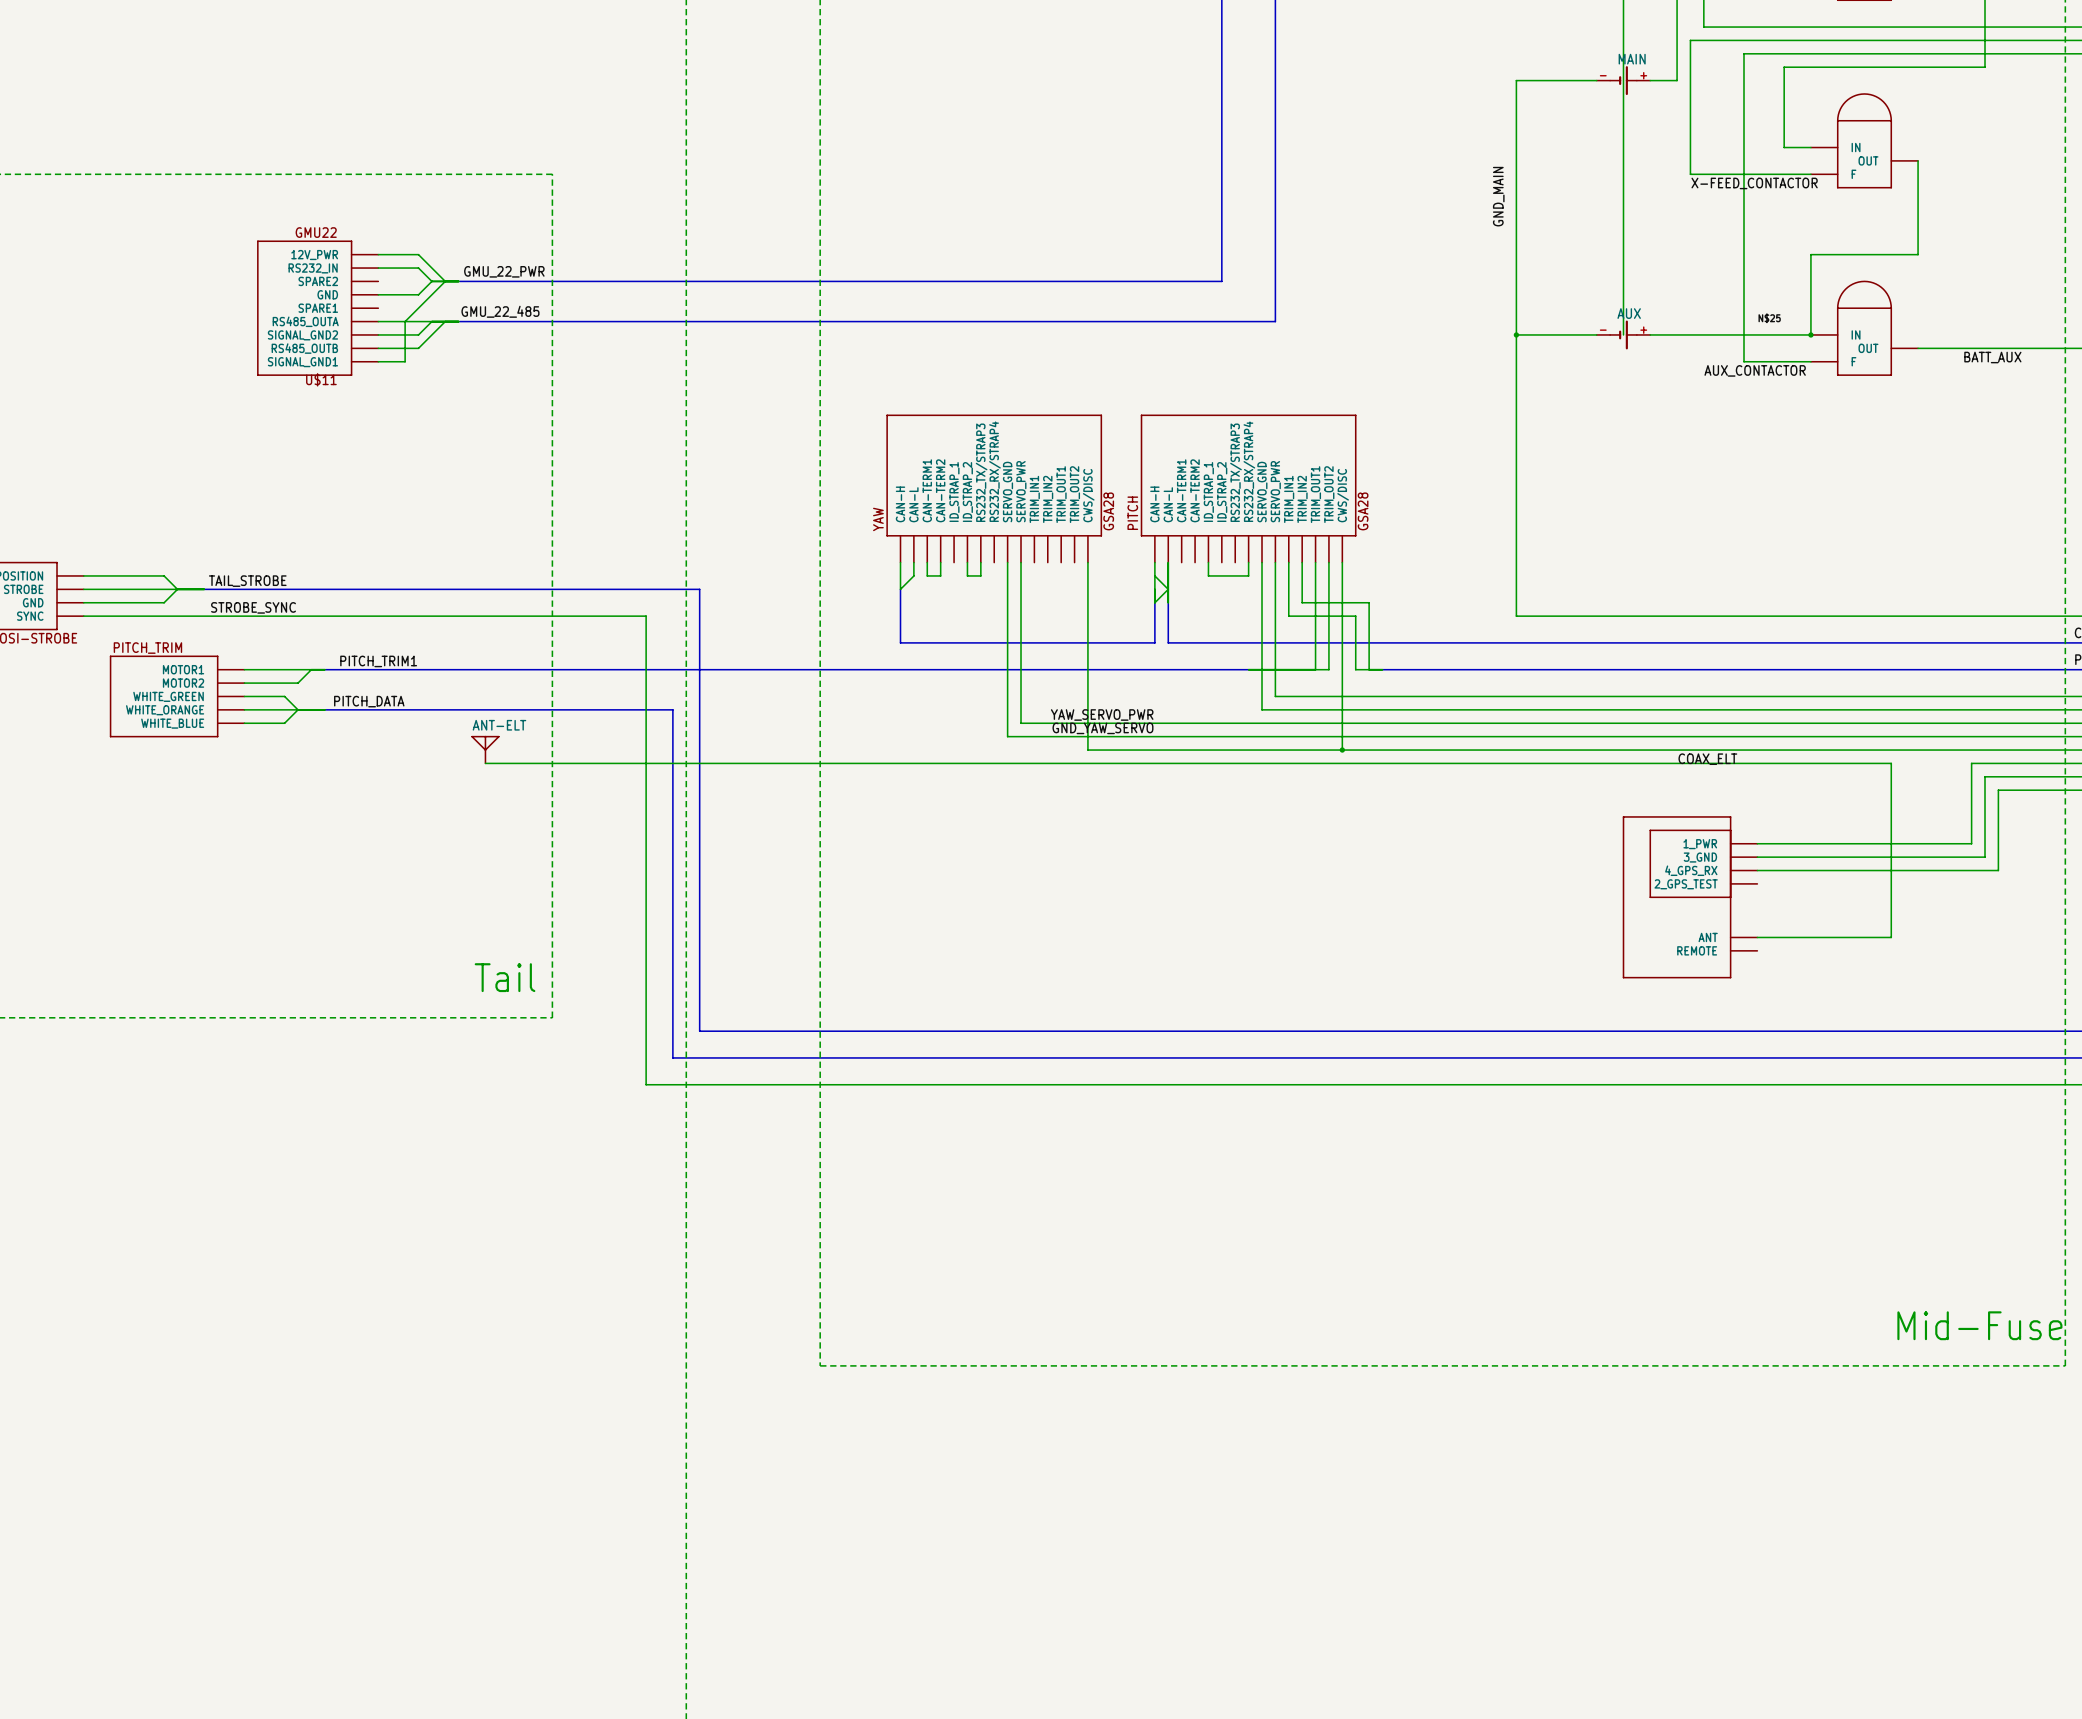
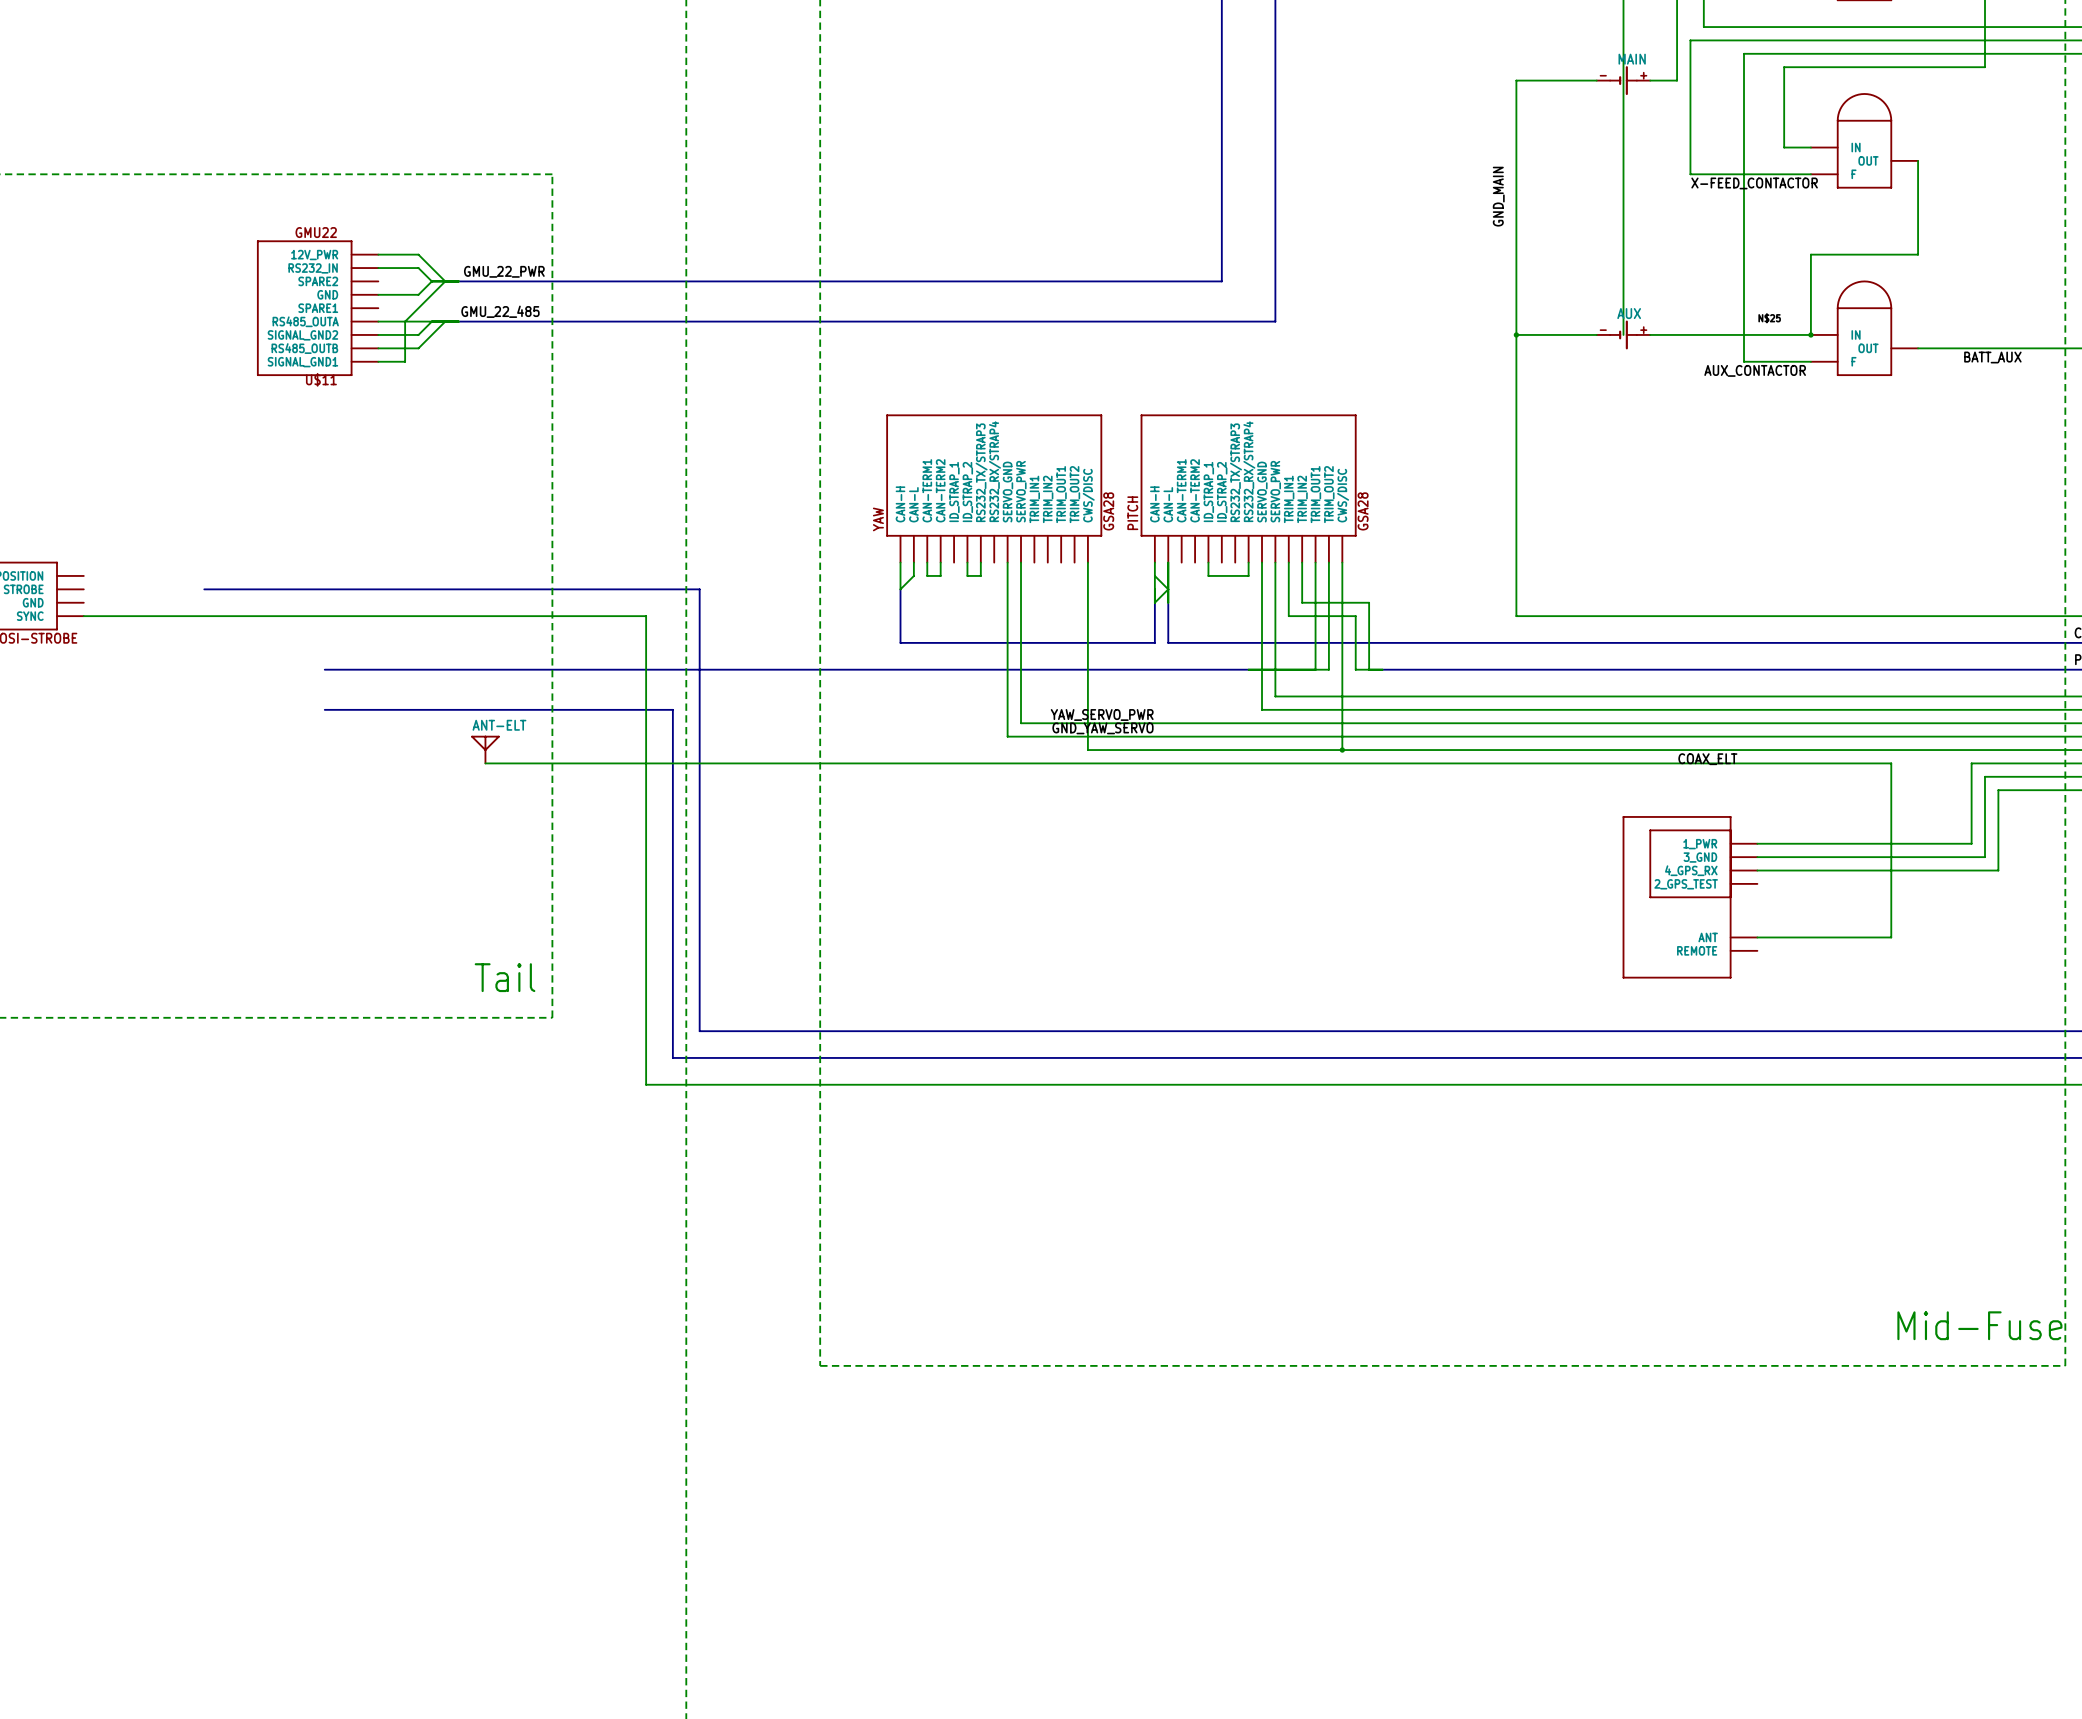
wire: (83, 575) (164, 575) (177, 589) (164, 602) (83, 602) -> none
label: TAIL_STROBE (247, 581) -> none
wire: (83, 589) (204, 589) -> none
label: STROBE_SYNC (253, 607) -> none
label: PITCH_TRIM1 (378, 661) -> none
wire: (244, 669) (324, 669) -> none
wire: (311, 669) (298, 683) (244, 683) -> none
PITCH_TRIM: (177, 696) -> none
wire: (244, 696) (284, 696) (298, 709) (284, 723) (244, 723) -> none
label: PITCH_DATA (369, 701) -> none
wire: (244, 709) (324, 709) -> none

